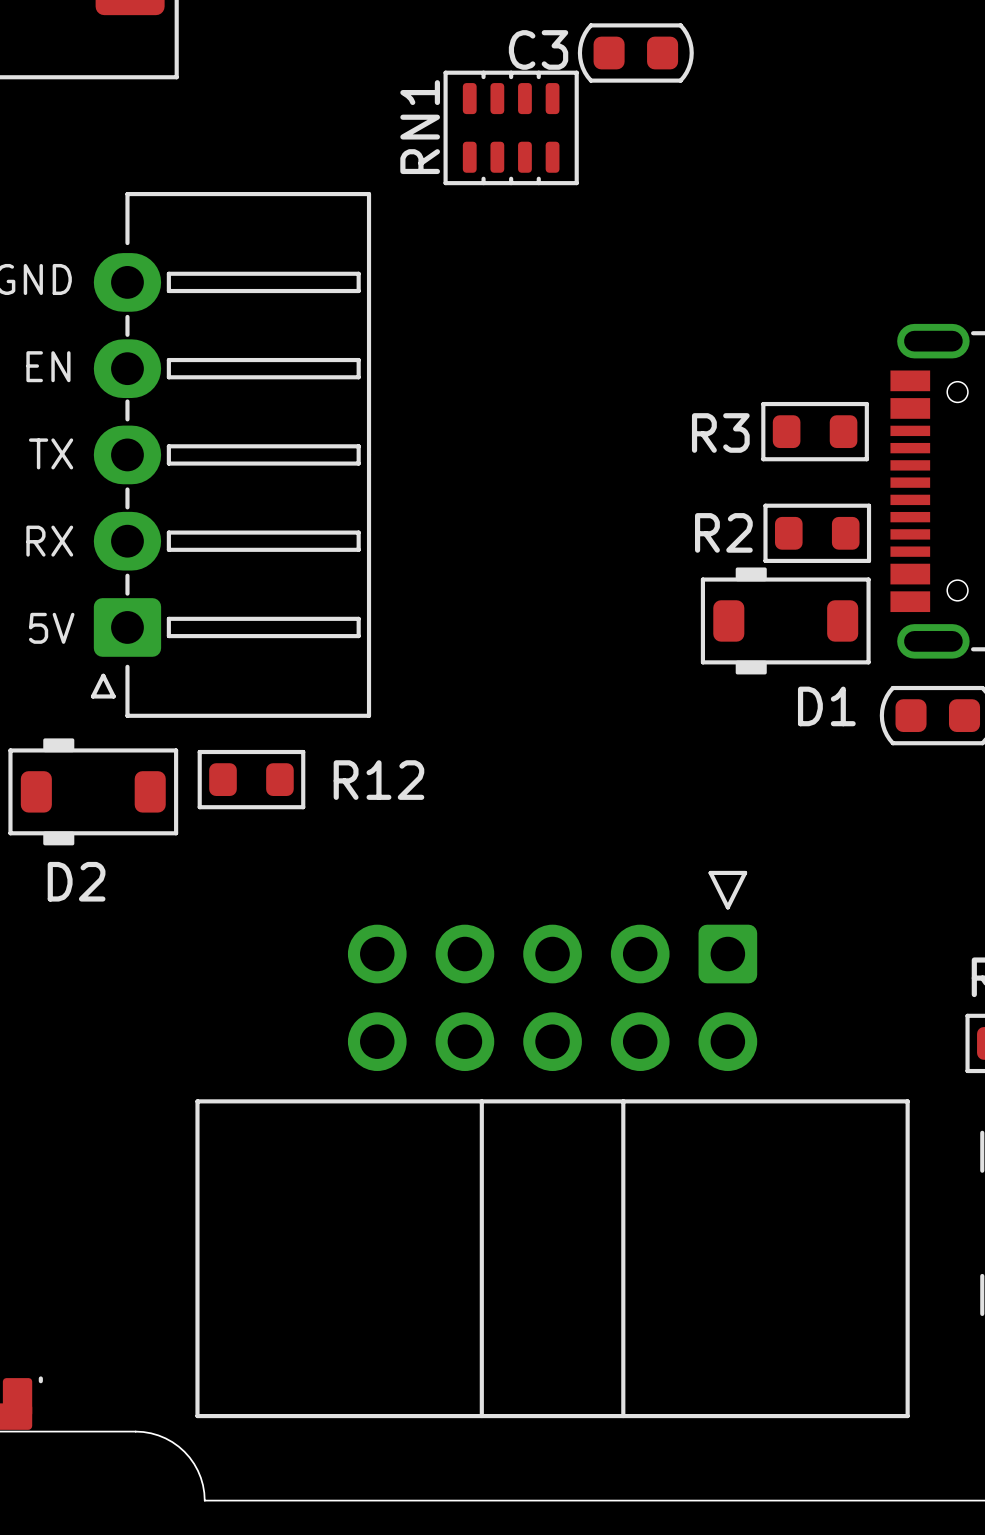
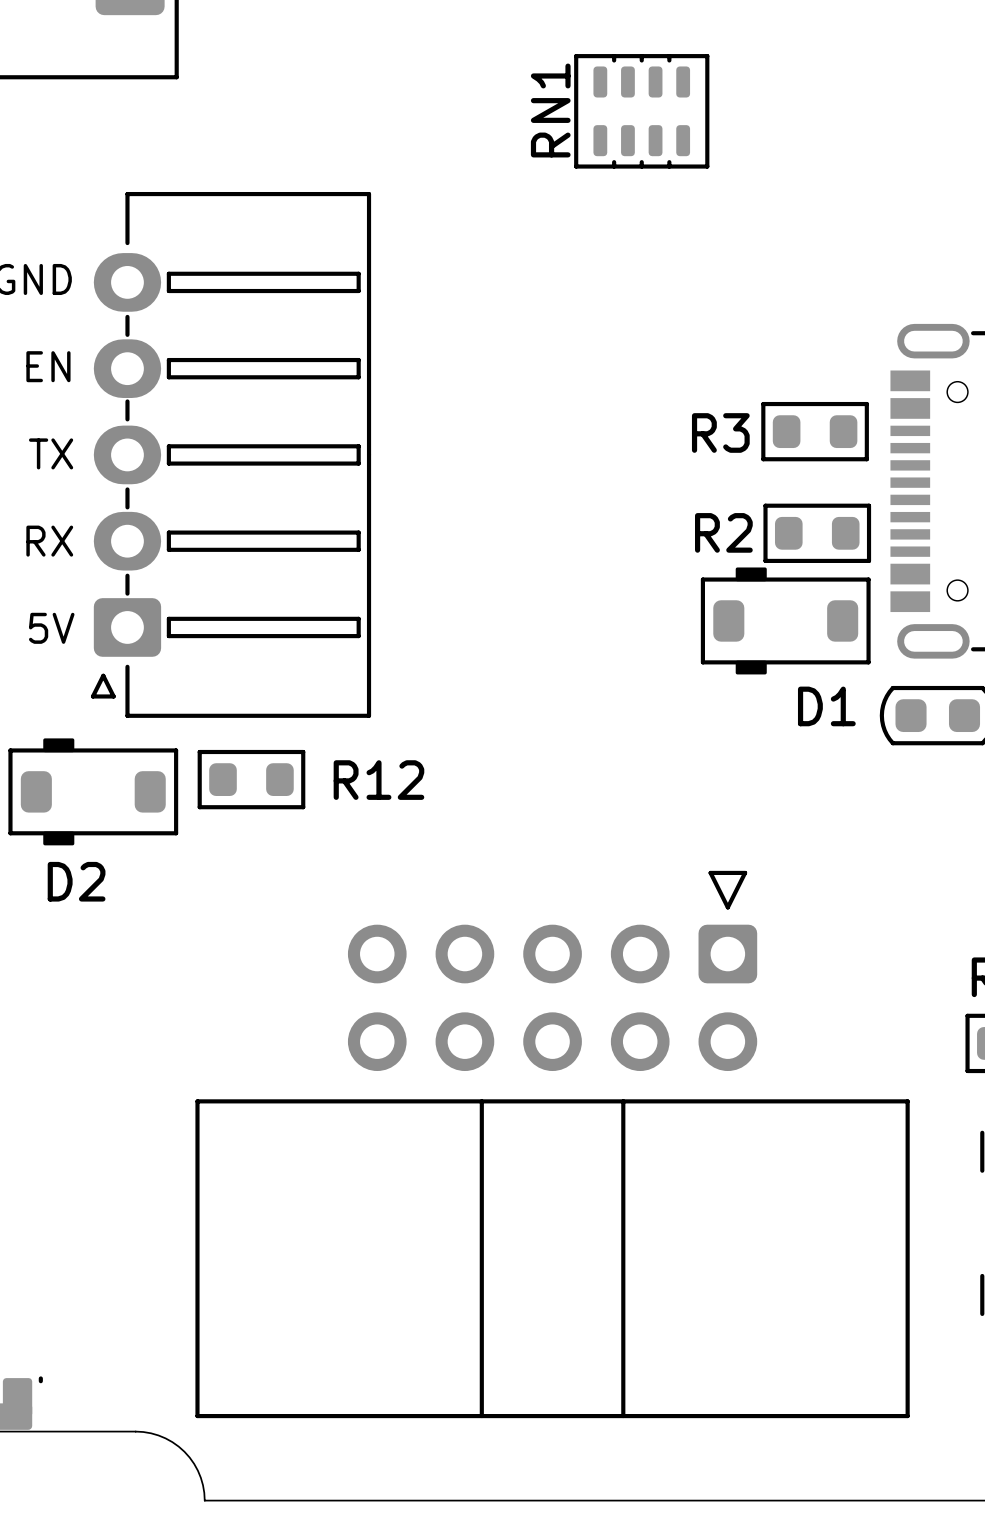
C3: (635, 53) -> none
RN1 position: (511, 127) -> (641, 111)

